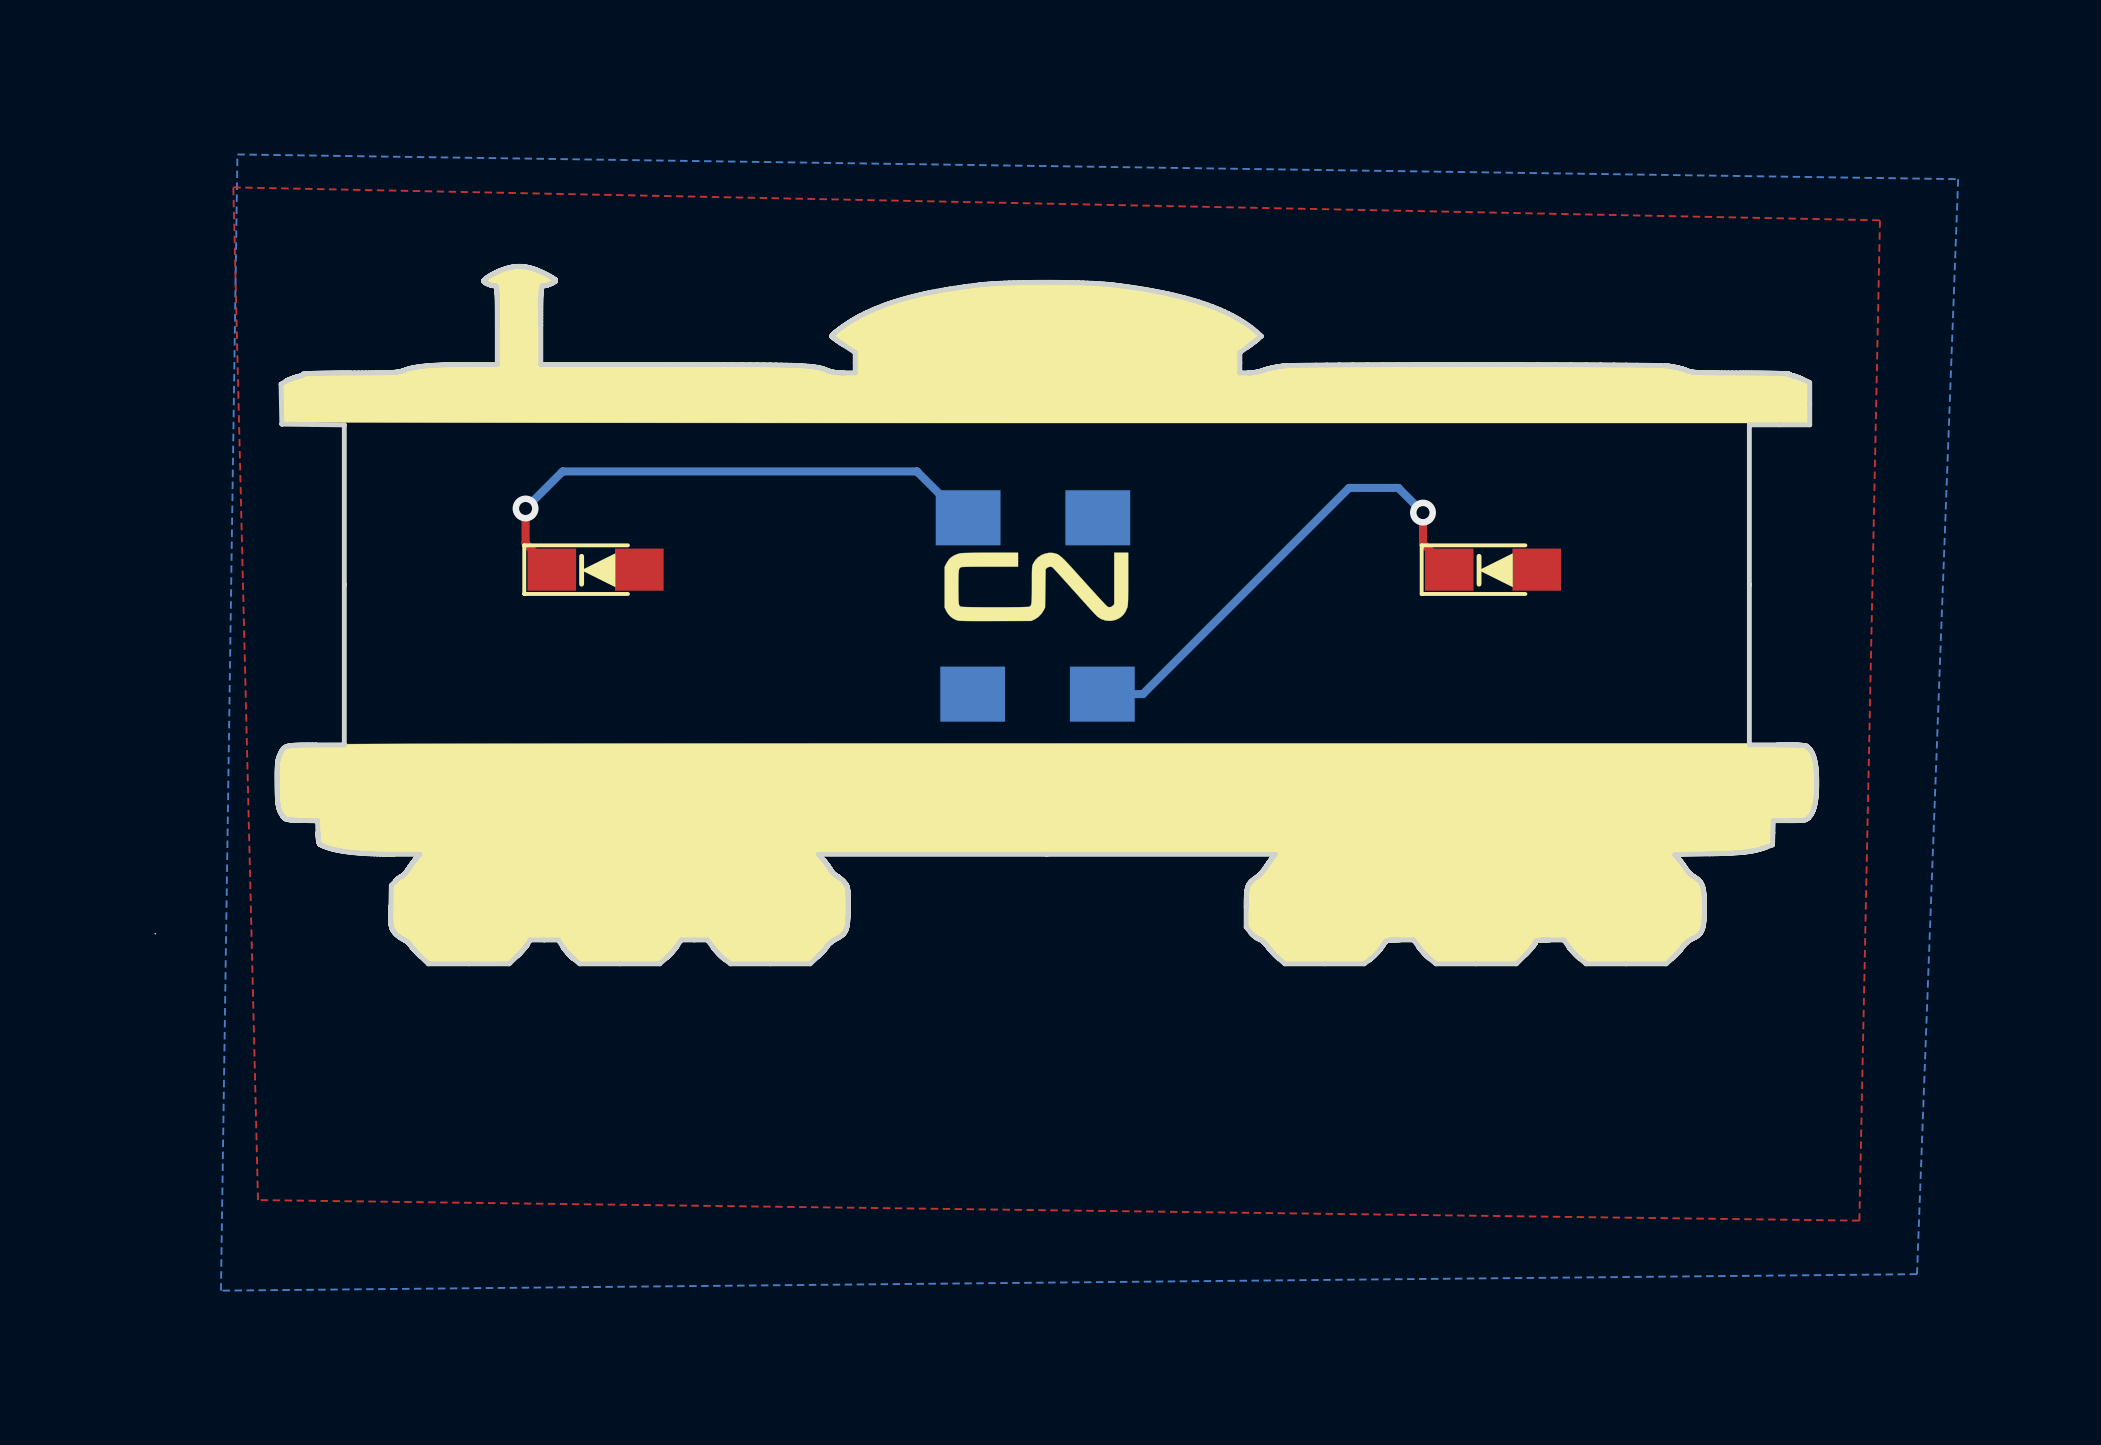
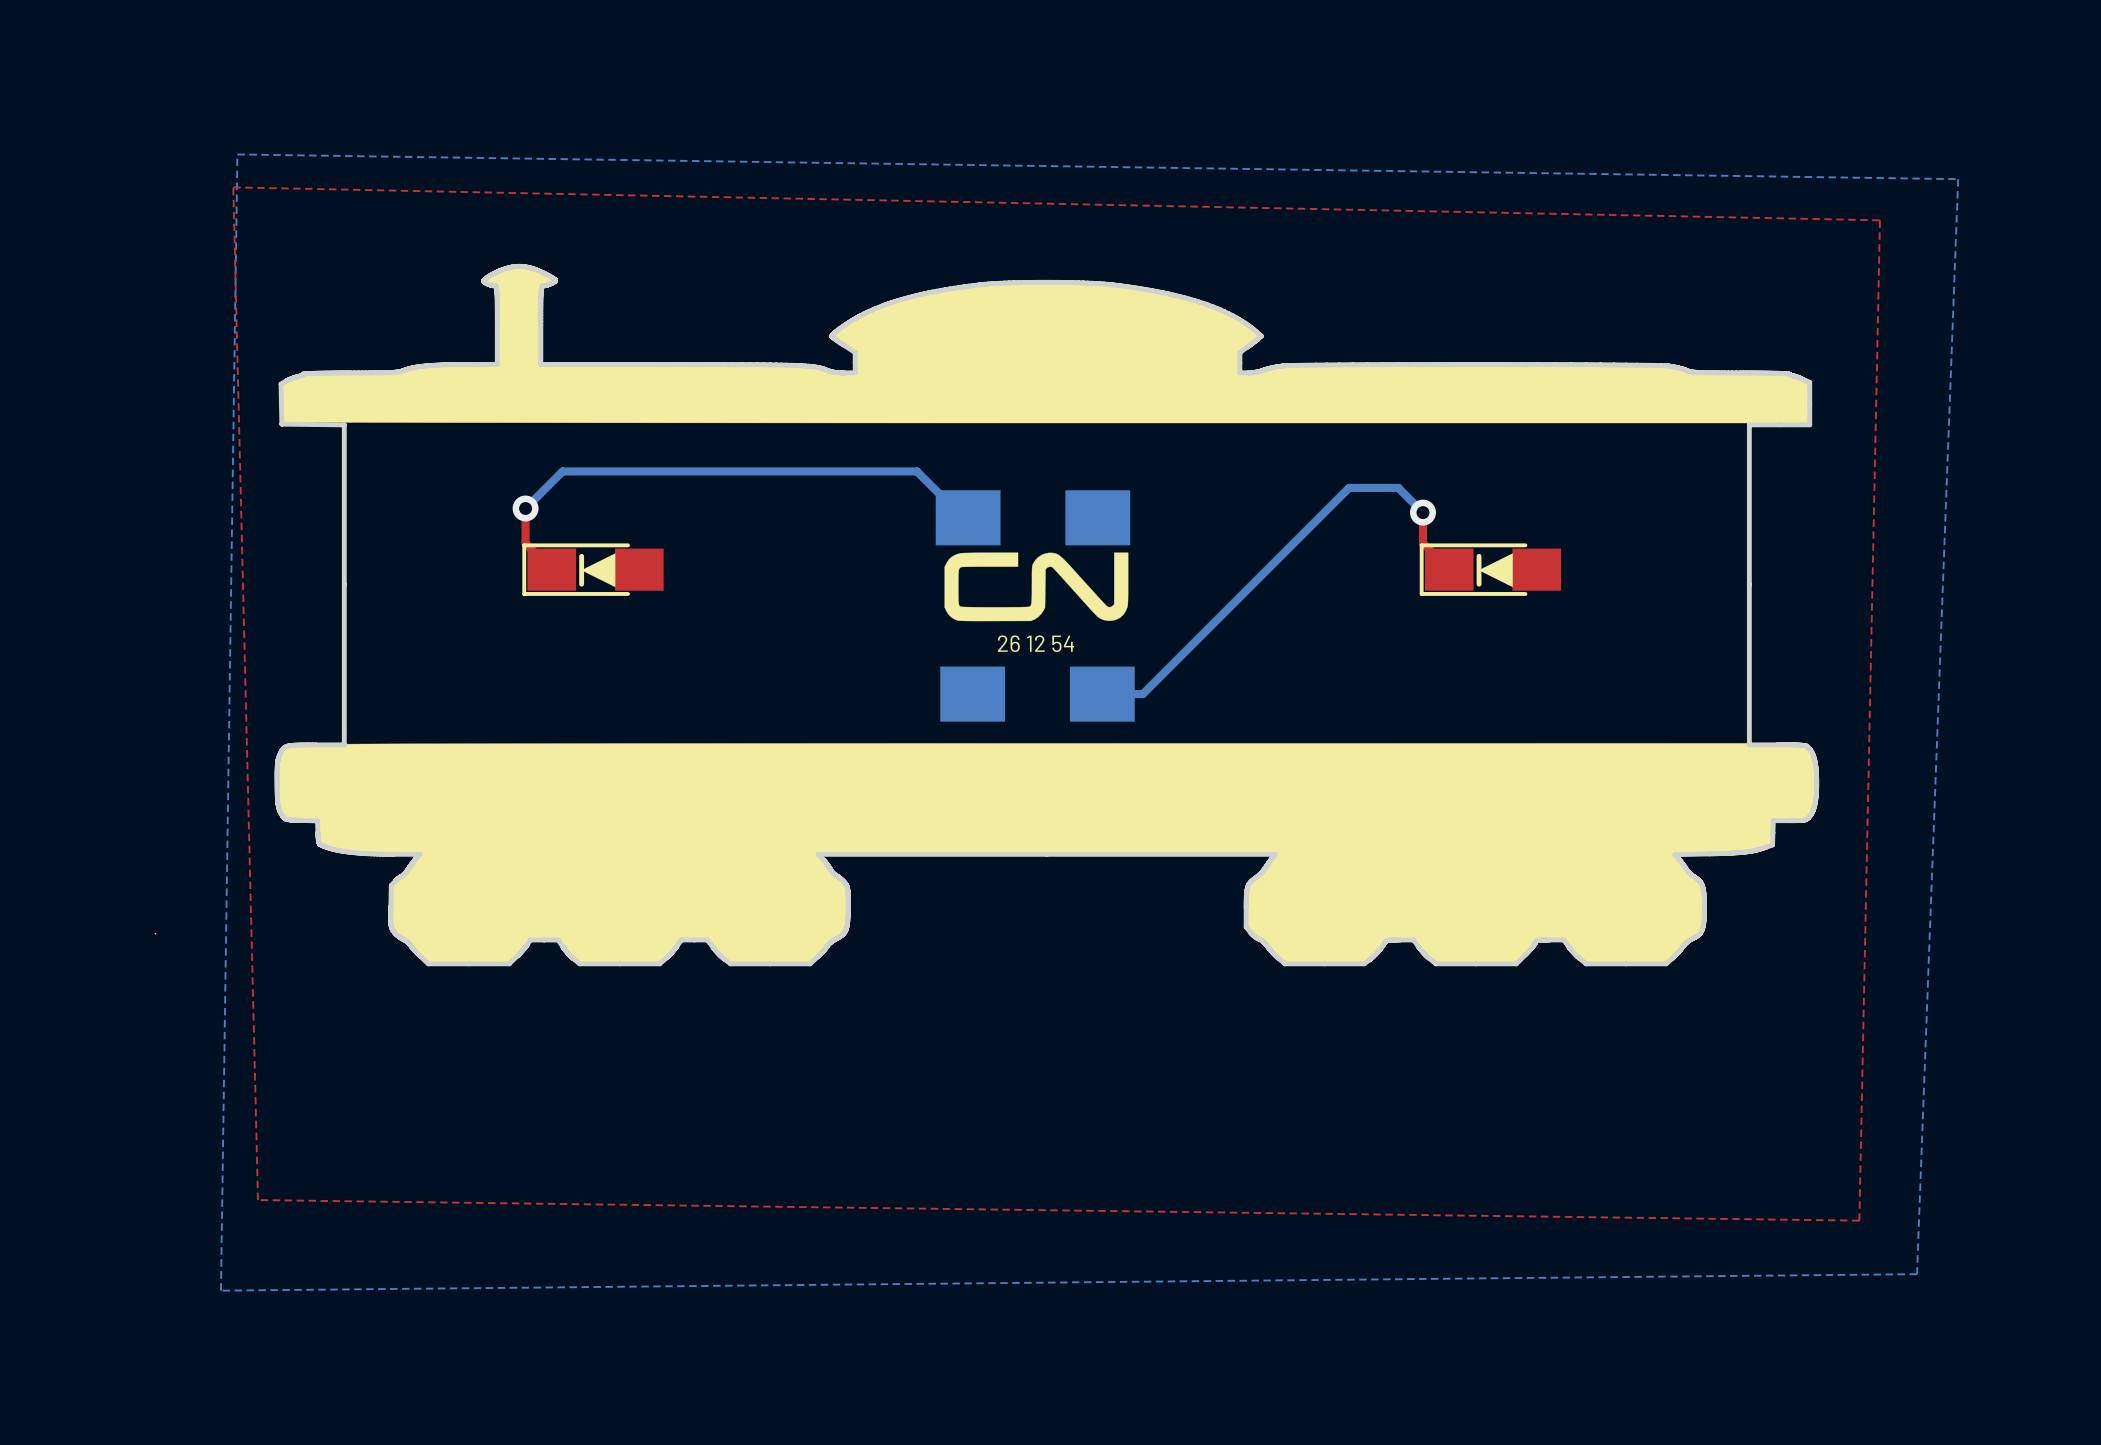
text: none -> 26 12 54 (1035, 643)

